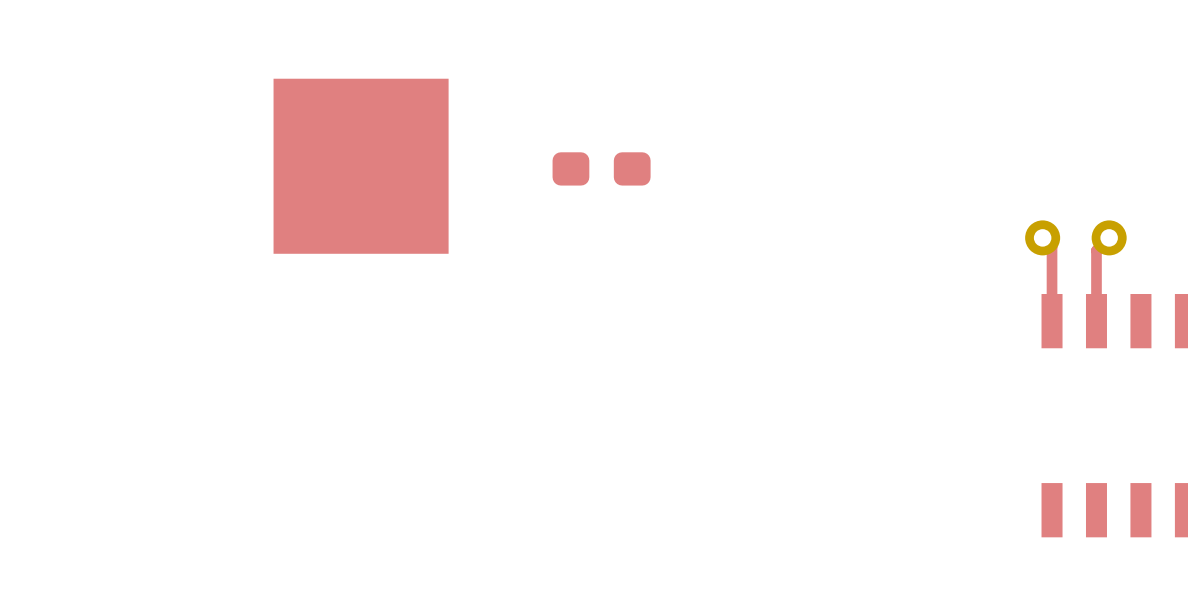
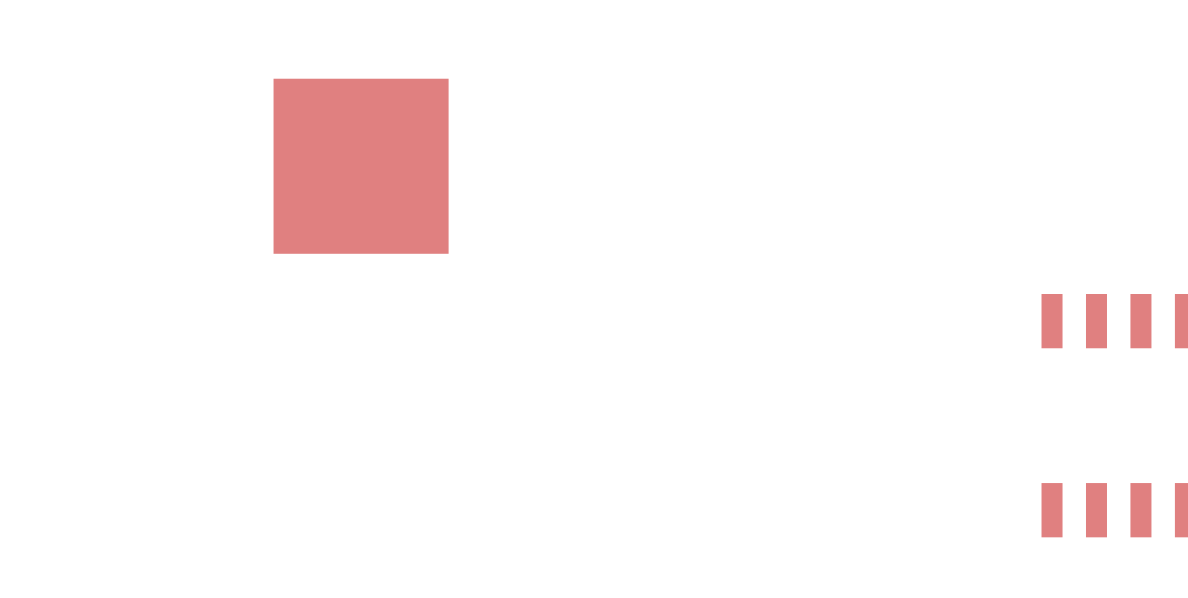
part: (601, 168) -> none
top track: (1042, 237) (1052, 247) (1052, 321) -> none
part: (1075, 237) -> none
top track: (1109, 237) (1096, 250) (1096, 321) -> none

